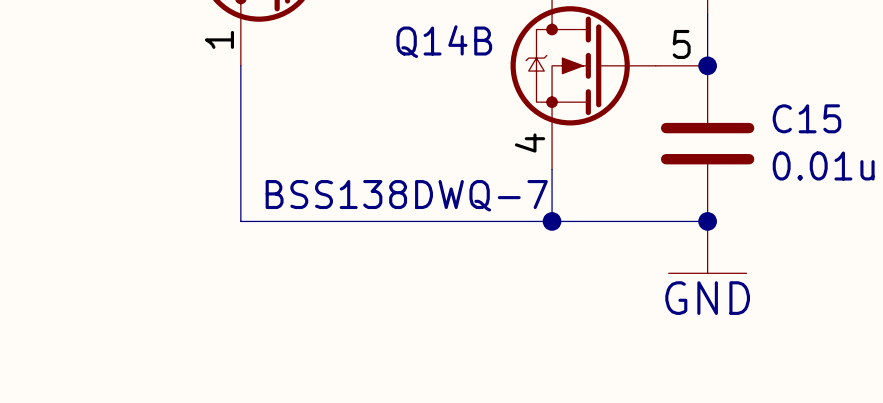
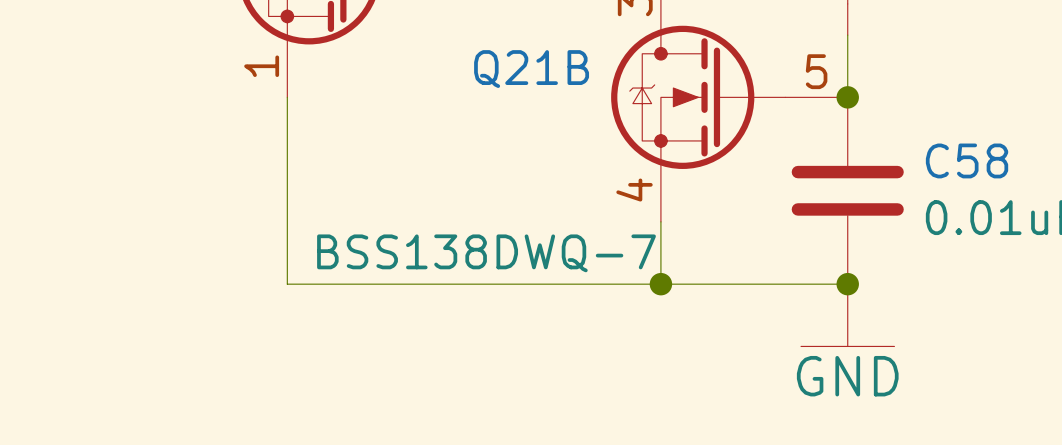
Q14B name: Q14B (444, 41) -> Q21B (531, 69)
C15 name: C15 (806, 118) -> C58 (967, 160)

